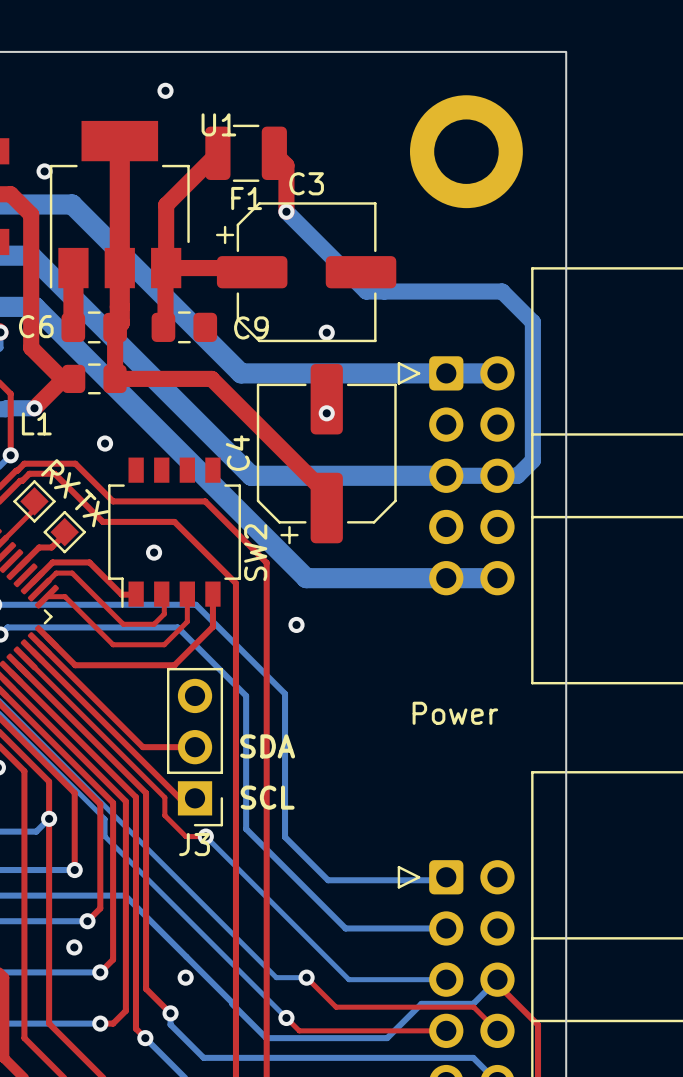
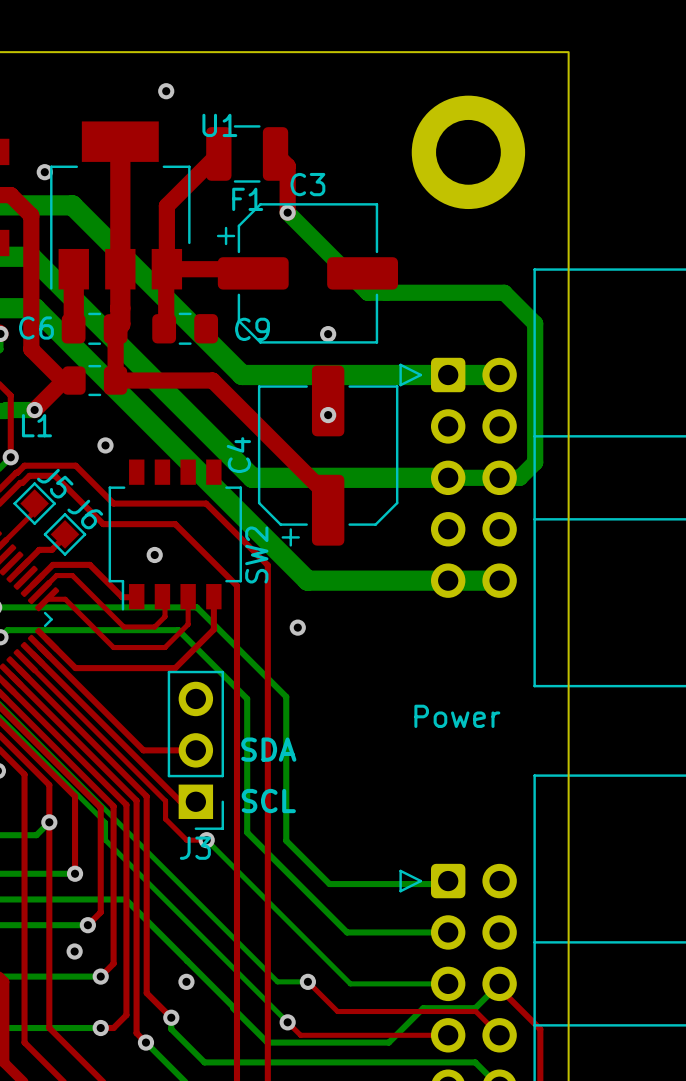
J5 value: RX (60, 478) -> none
J5 name: none -> J5 (55, 483)
J6 value: TX (92, 508) -> none
J6 name: none -> J6 (85, 514)

